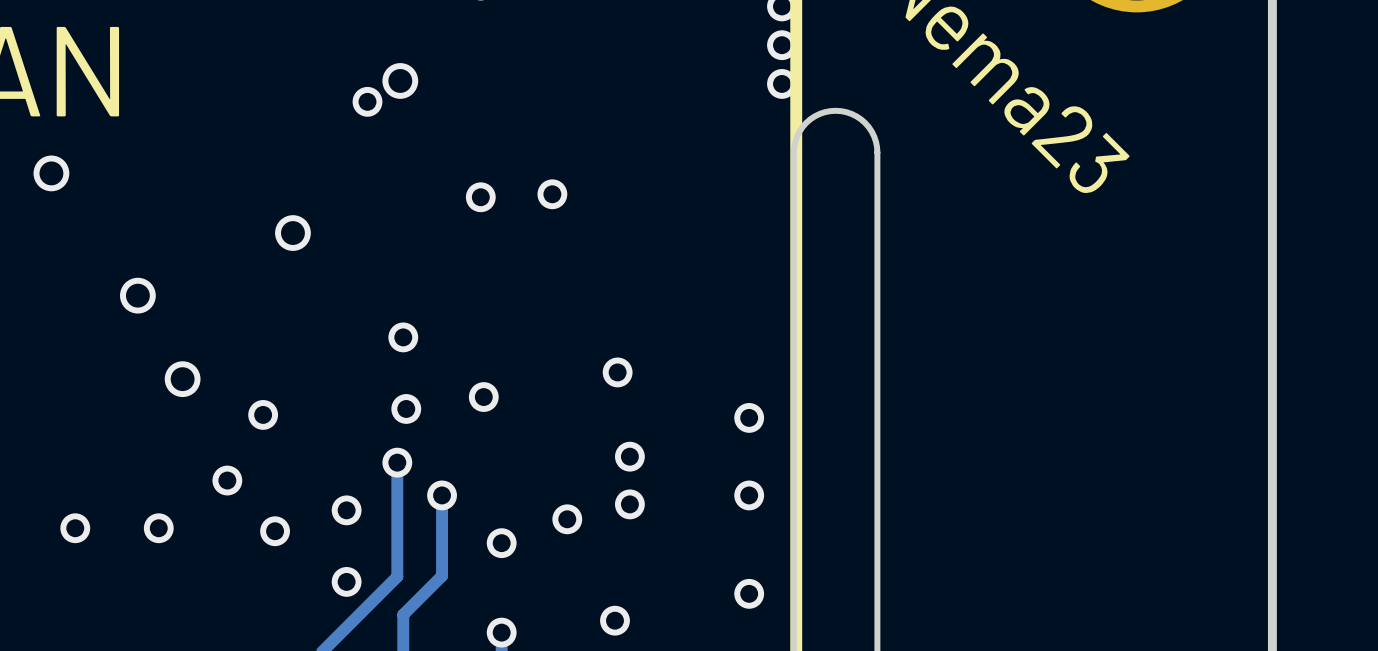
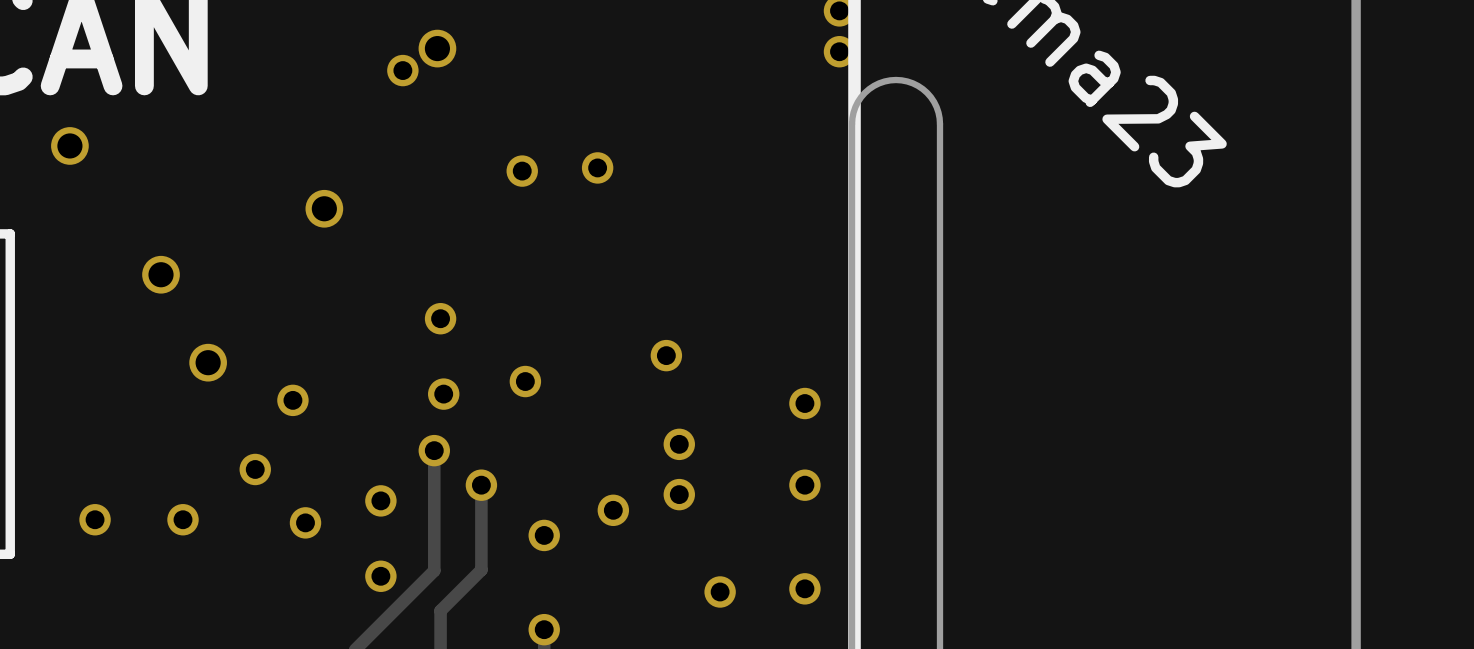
via: none -> (720, 591)
via: (614, 620) -> none

